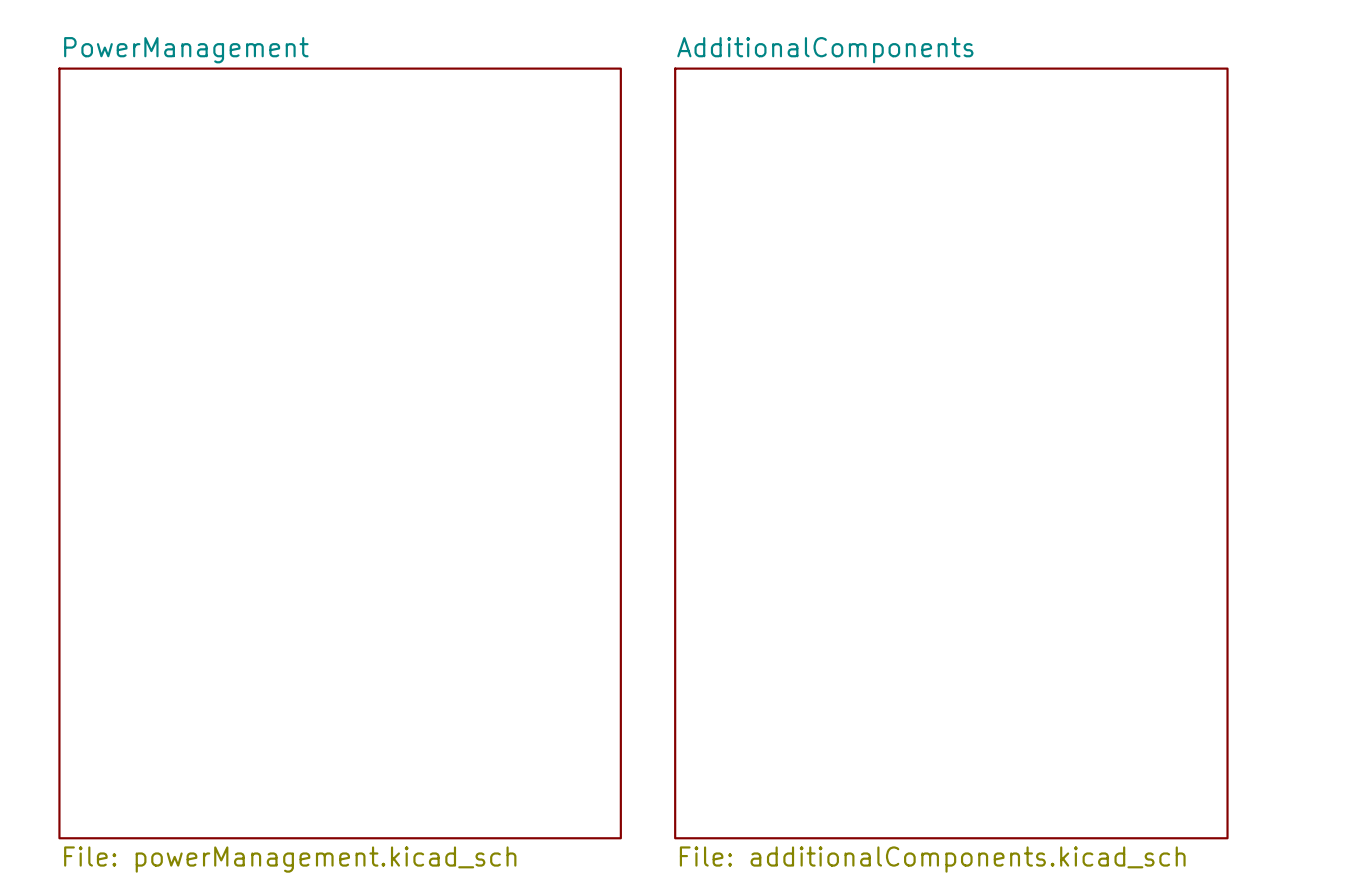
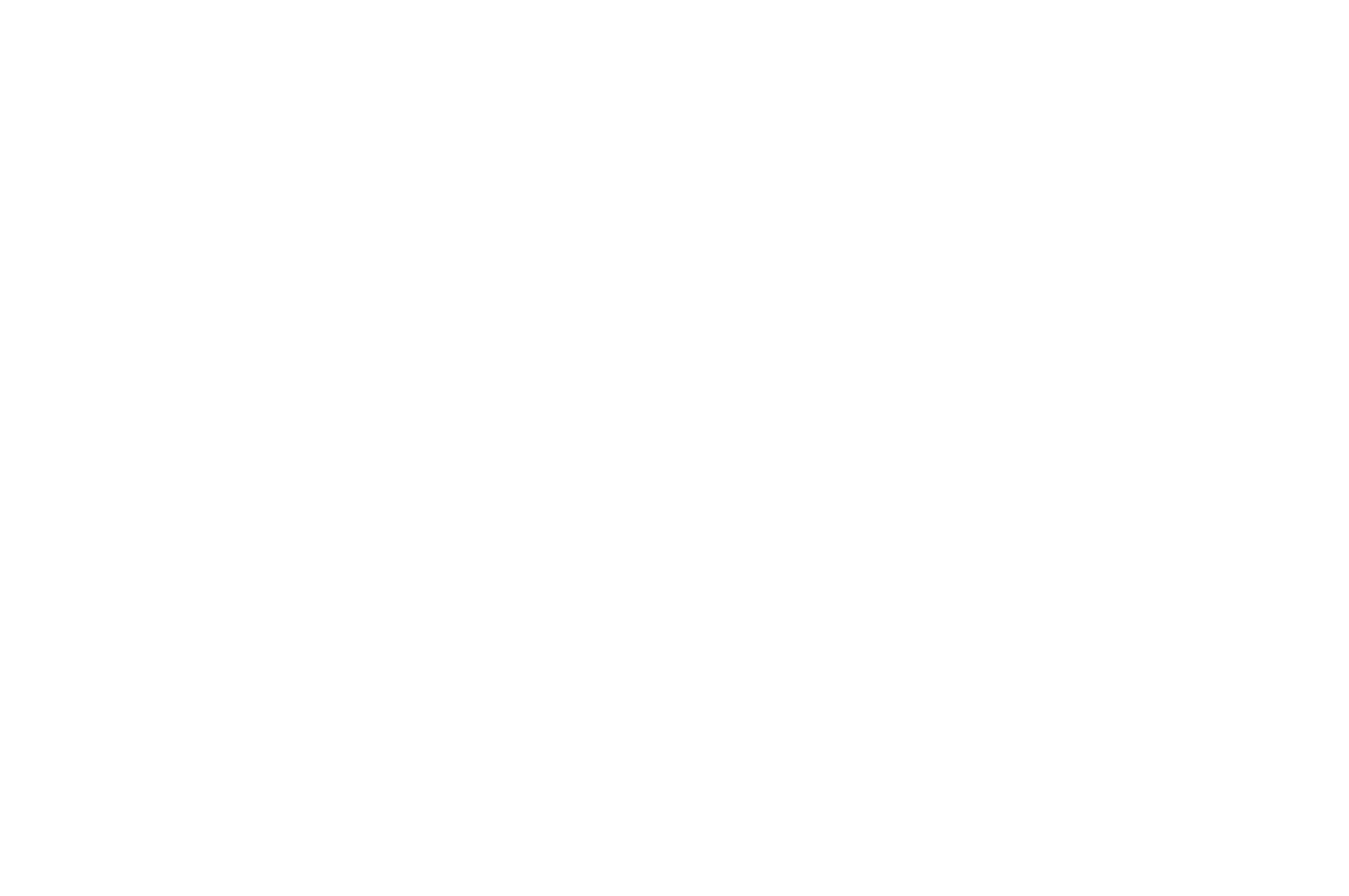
sheet PowerManagement: File: powerManagement.kicad_sch (340, 453) -> none
sheet AdditionalComponents: File: additionalComponents.kicad_sch (951, 453) -> none

